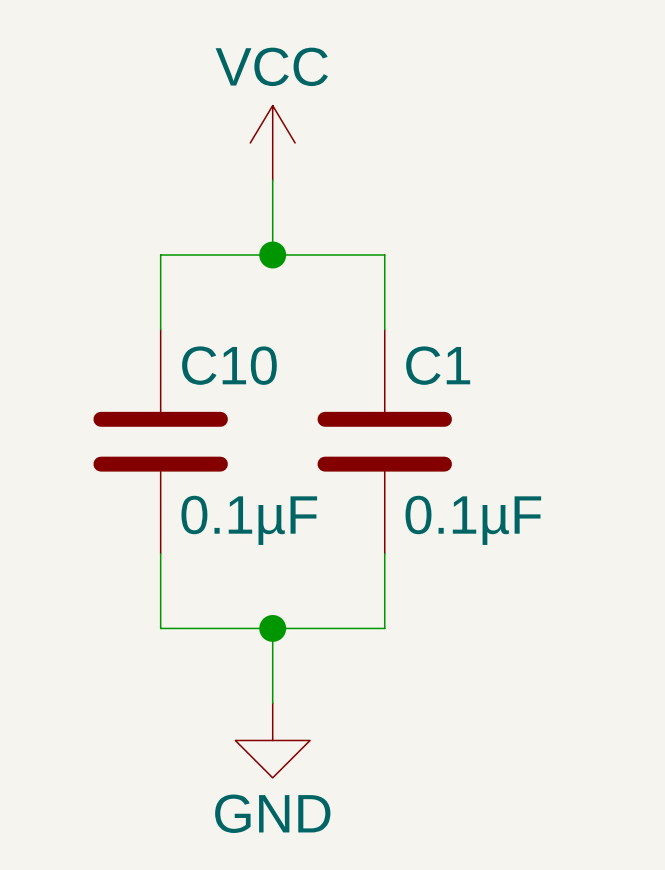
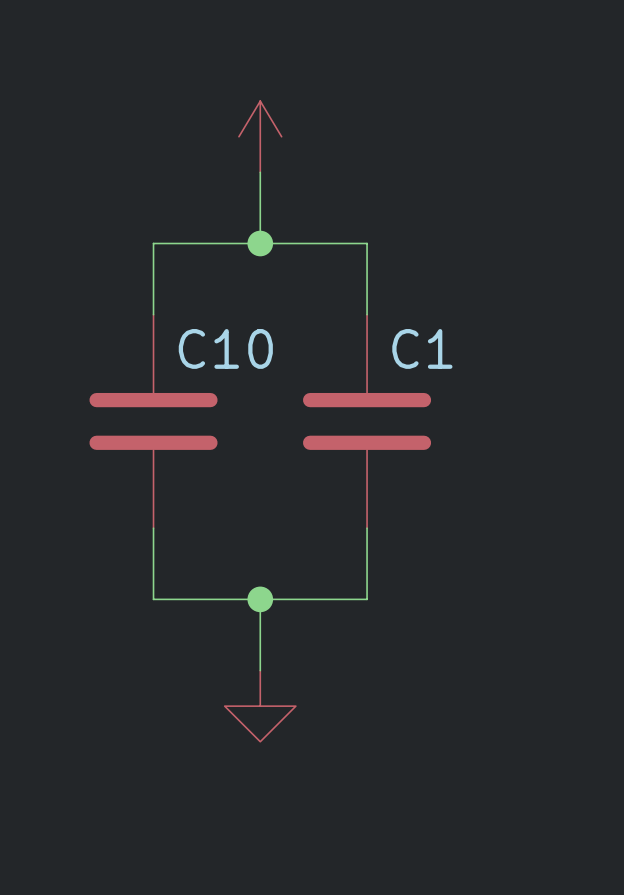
power symbol text: VCC (271, 66) -> none
C10 value: 0.1µF (249, 520) -> none
C1 value: 0.1µF (473, 520) -> none
power symbol text: GND (272, 813) -> none

